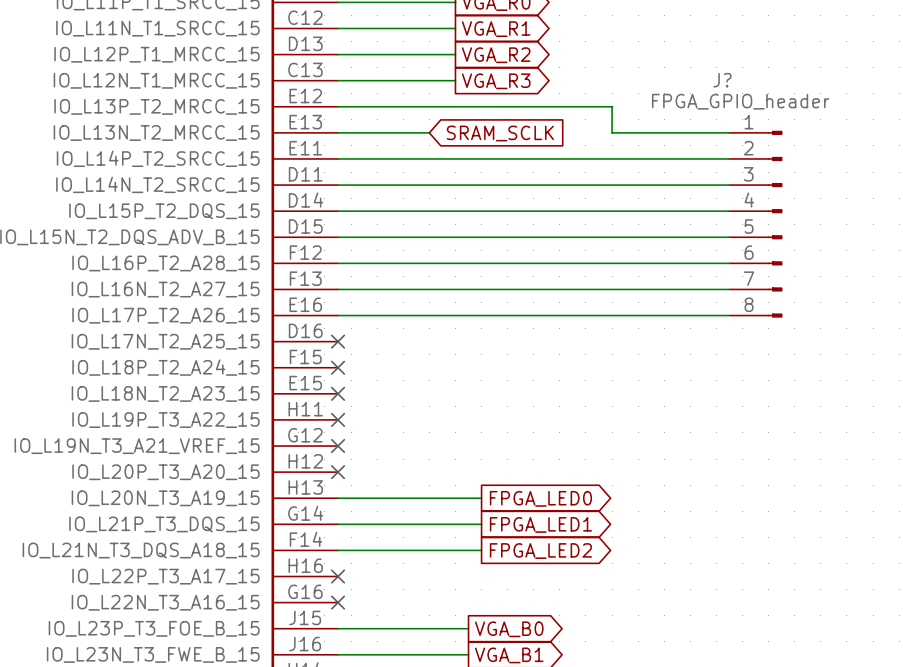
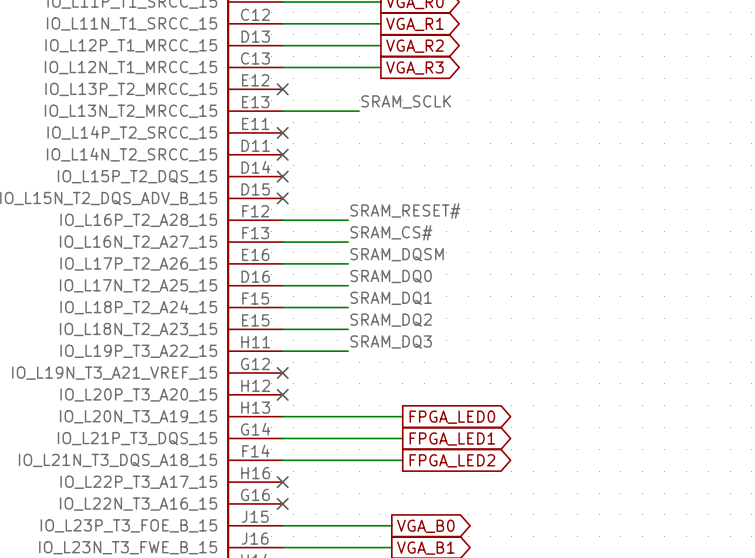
wire: (338, 106) (612, 106) (612, 132) (729, 132) -> none
no-connect mark: none -> (282, 89)
label: none -> SRAM_SCLK (406, 101)
global label: SRAM_SCLK (500, 133) -> none
wire: (338, 158) (729, 158) -> none
no-connect mark: none -> (282, 132)
wire: (338, 185) (729, 185) -> none
no-connect mark: none -> (282, 154)
wire: (338, 211) (729, 211) -> none
no-connect mark: none -> (282, 176)
J?: FPGA_GPIO_header (755, 224) -> none
wire: (338, 237) (729, 237) -> none
no-connect mark: none -> (282, 198)
label: none -> SRAM_RESET# (405, 211)
wire: (416, 263) (729, 263) -> none
label: none -> SRAM_CS# (391, 232)
wire: (416, 289) (729, 289) -> none
label: none -> SRAM_DQSM (397, 254)
wire: (416, 315) (729, 315) -> none
label: none -> SRAM_DQ0 (391, 276)
wire: none -> (282, 285) (348, 285)
no-connect mark: (338, 341) -> none
label: none -> SRAM_DQ1 (391, 298)
wire: none -> (282, 307) (348, 307)
no-connect mark: (338, 367) -> none
label: none -> SRAM_DQ2 (391, 320)
wire: none -> (282, 329) (348, 329)
no-connect mark: (338, 393) -> none
label: none -> SRAM_DQ3 (391, 341)
wire: none -> (282, 351) (348, 351)
no-connect mark: (338, 419) -> none

